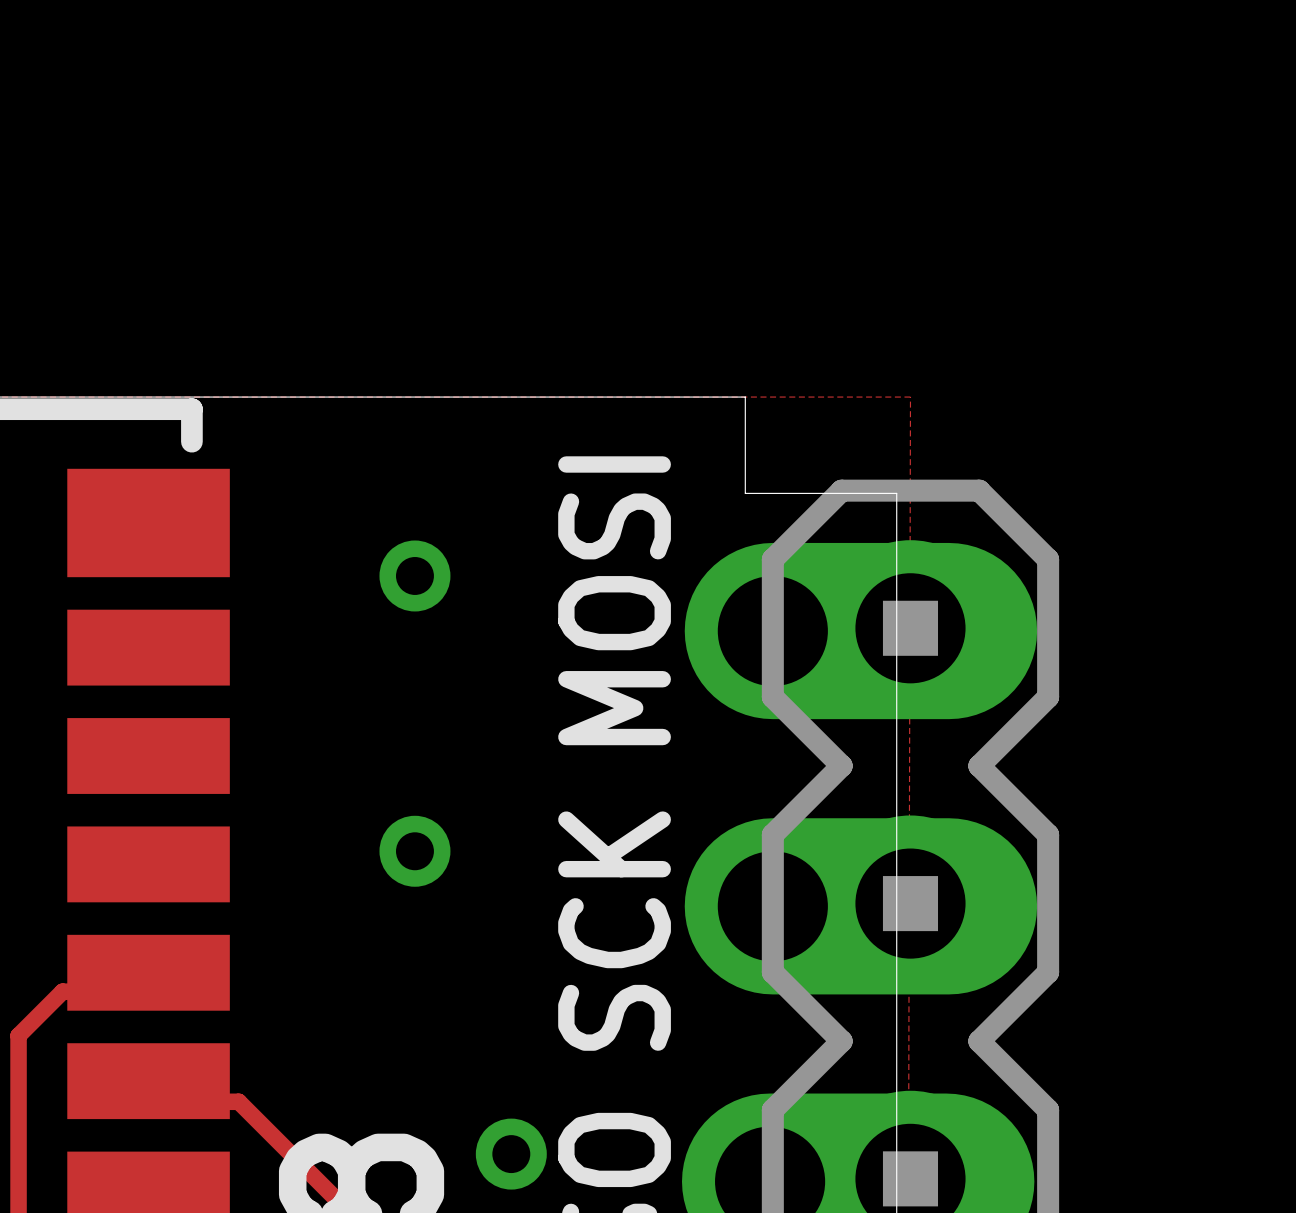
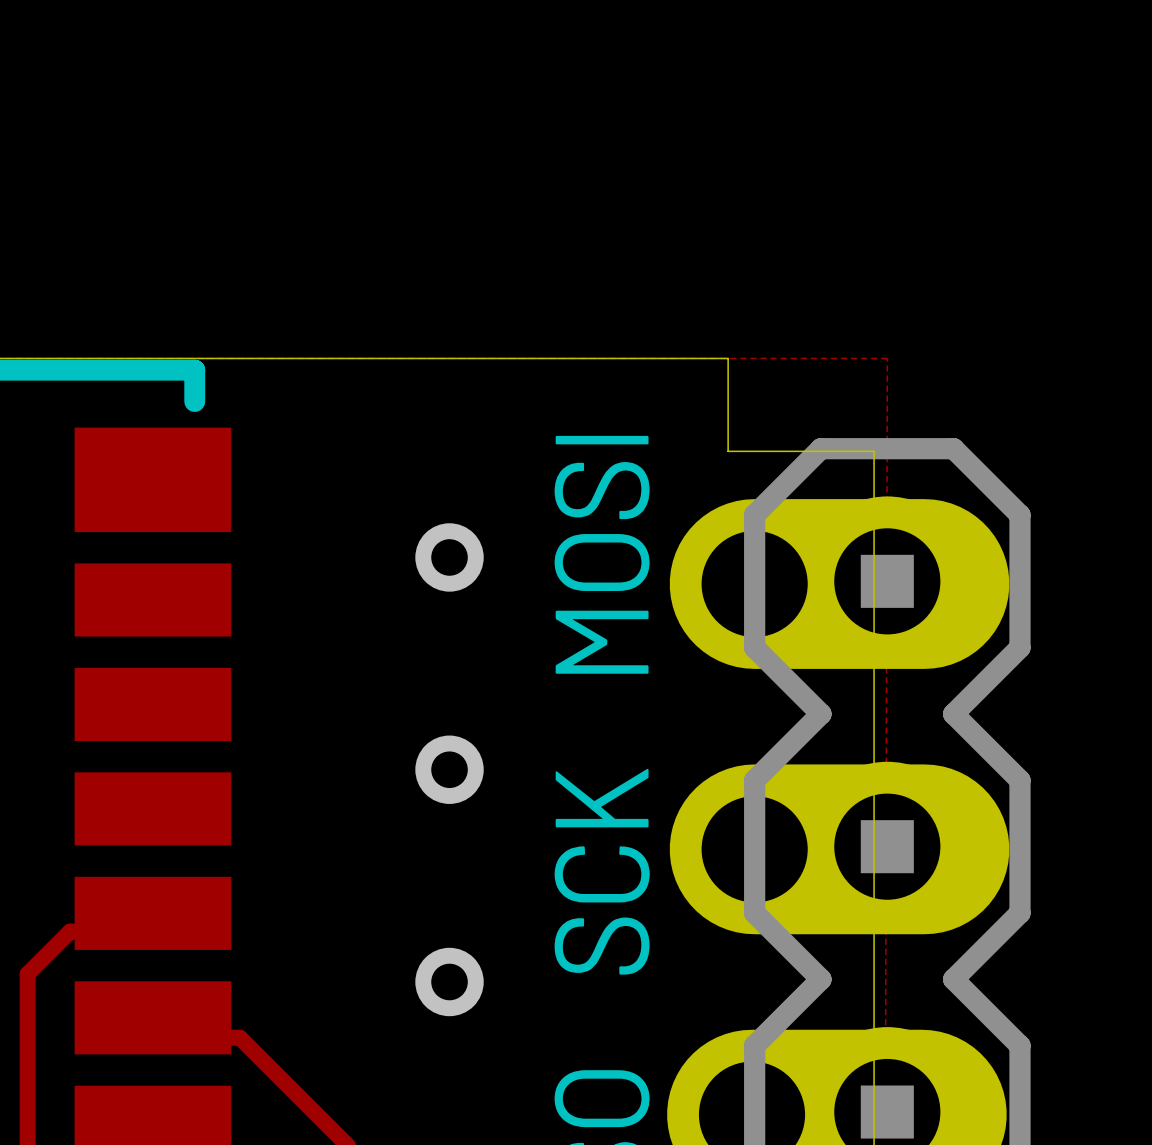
via position: (414, 575) -> (449, 557)
via position: (414, 851) -> (449, 769)
via: none -> (449, 982)
via: (511, 1154) -> none

